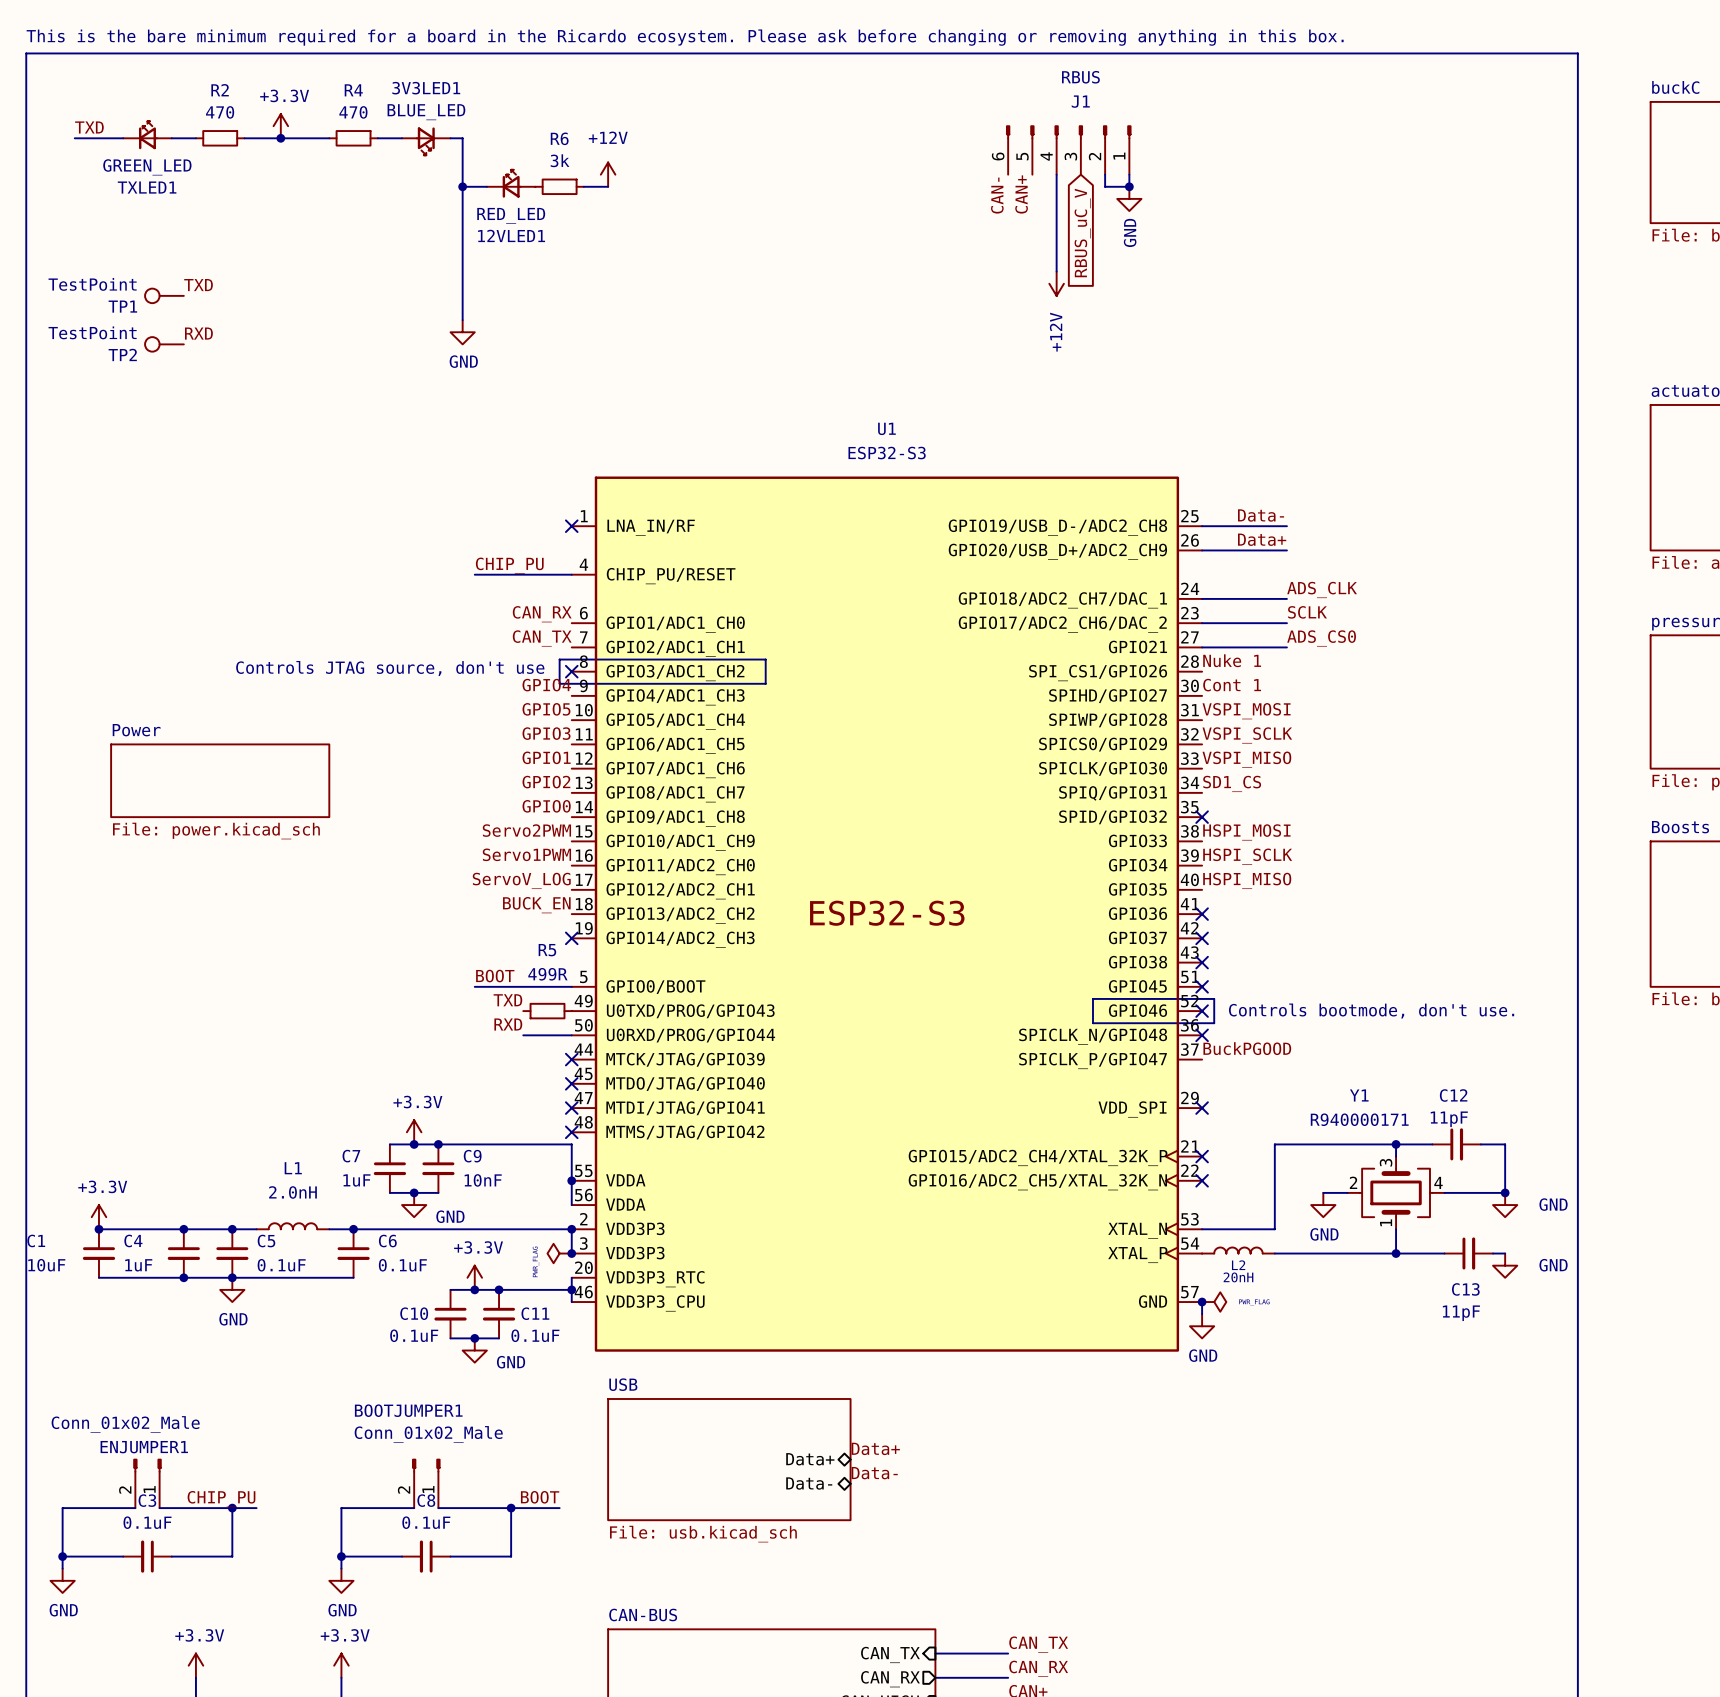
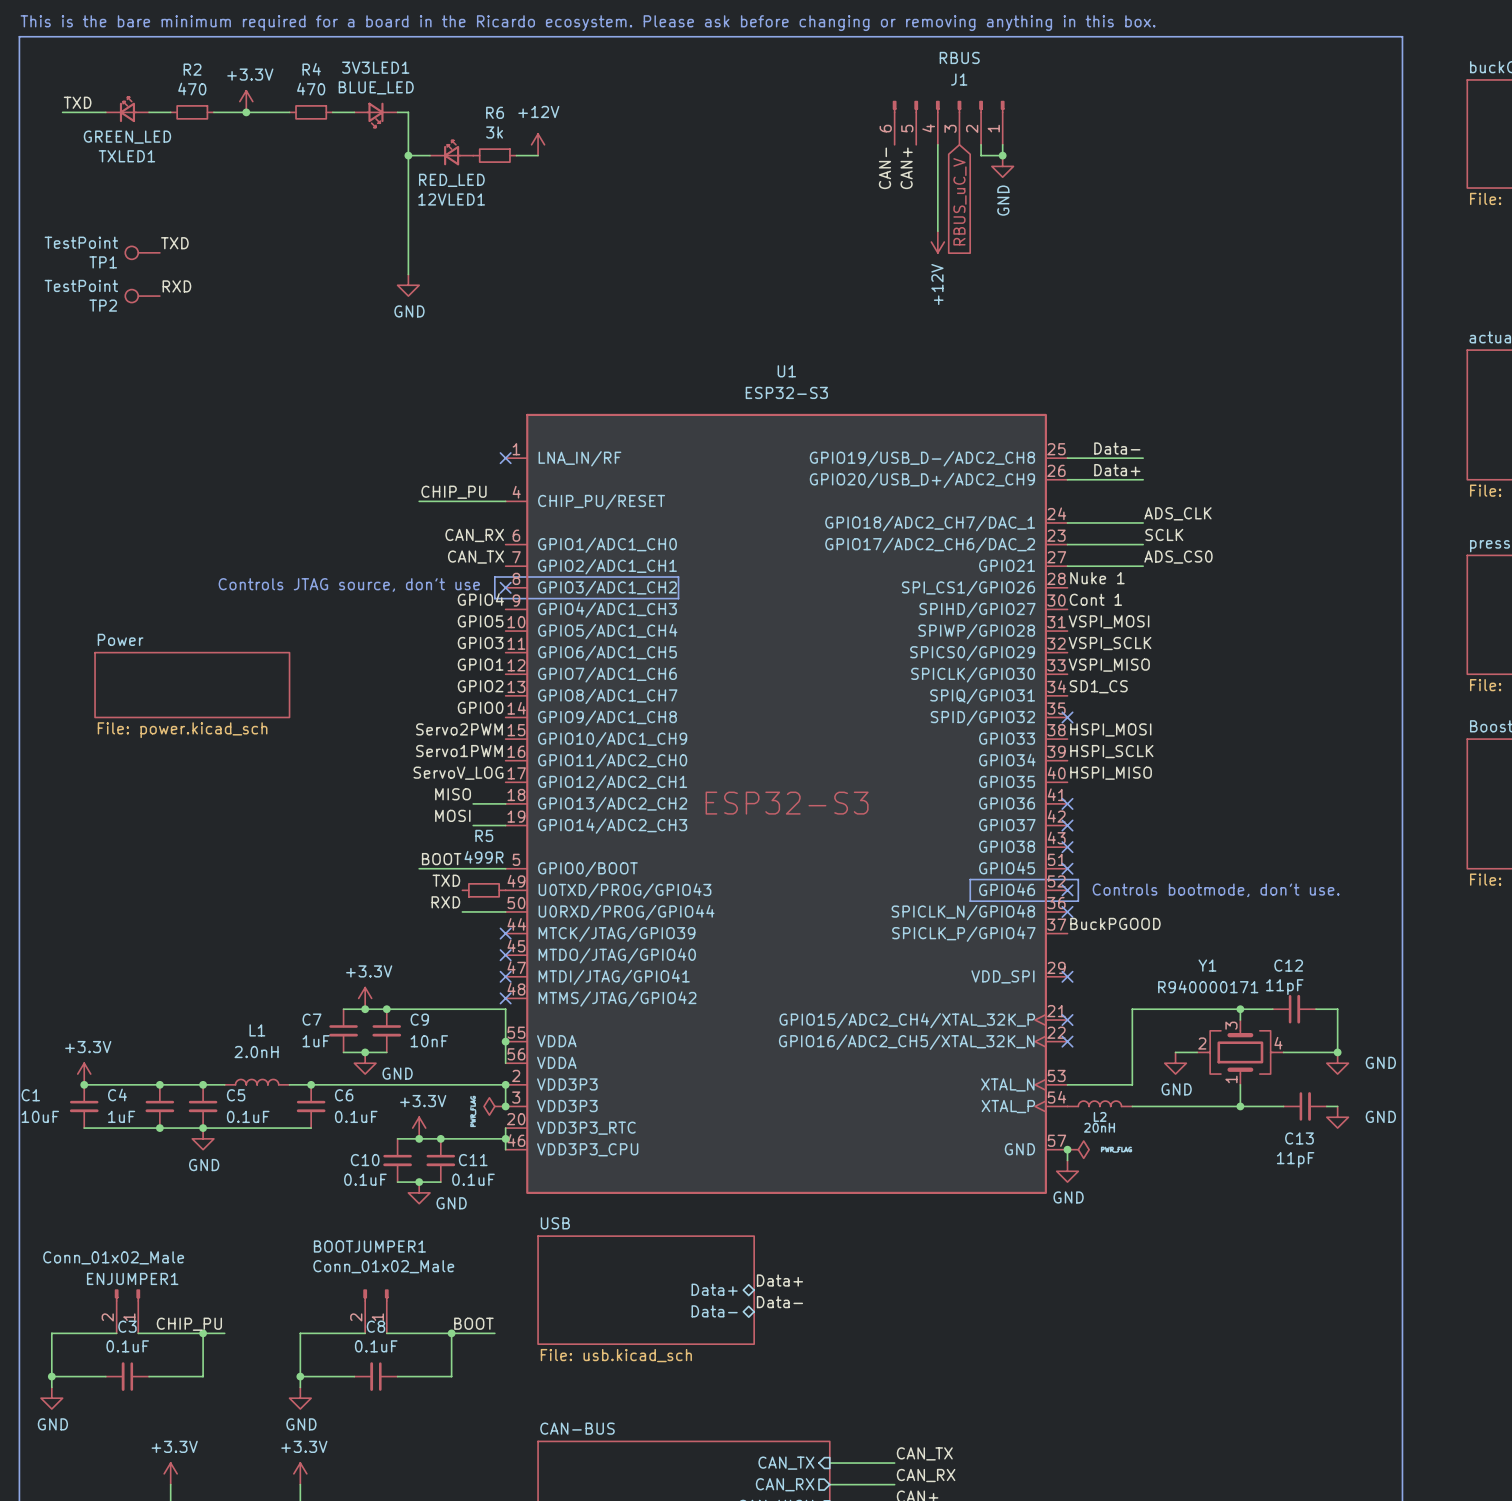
label: none -> MISO (453, 794)
label: BUCK_EN (536, 905) -> none
wire: none -> (473, 803) (505, 803)
label: none -> MOSI (452, 815)
wire: none -> (473, 825) (505, 825)
no-connect mark: (571, 938) -> none

